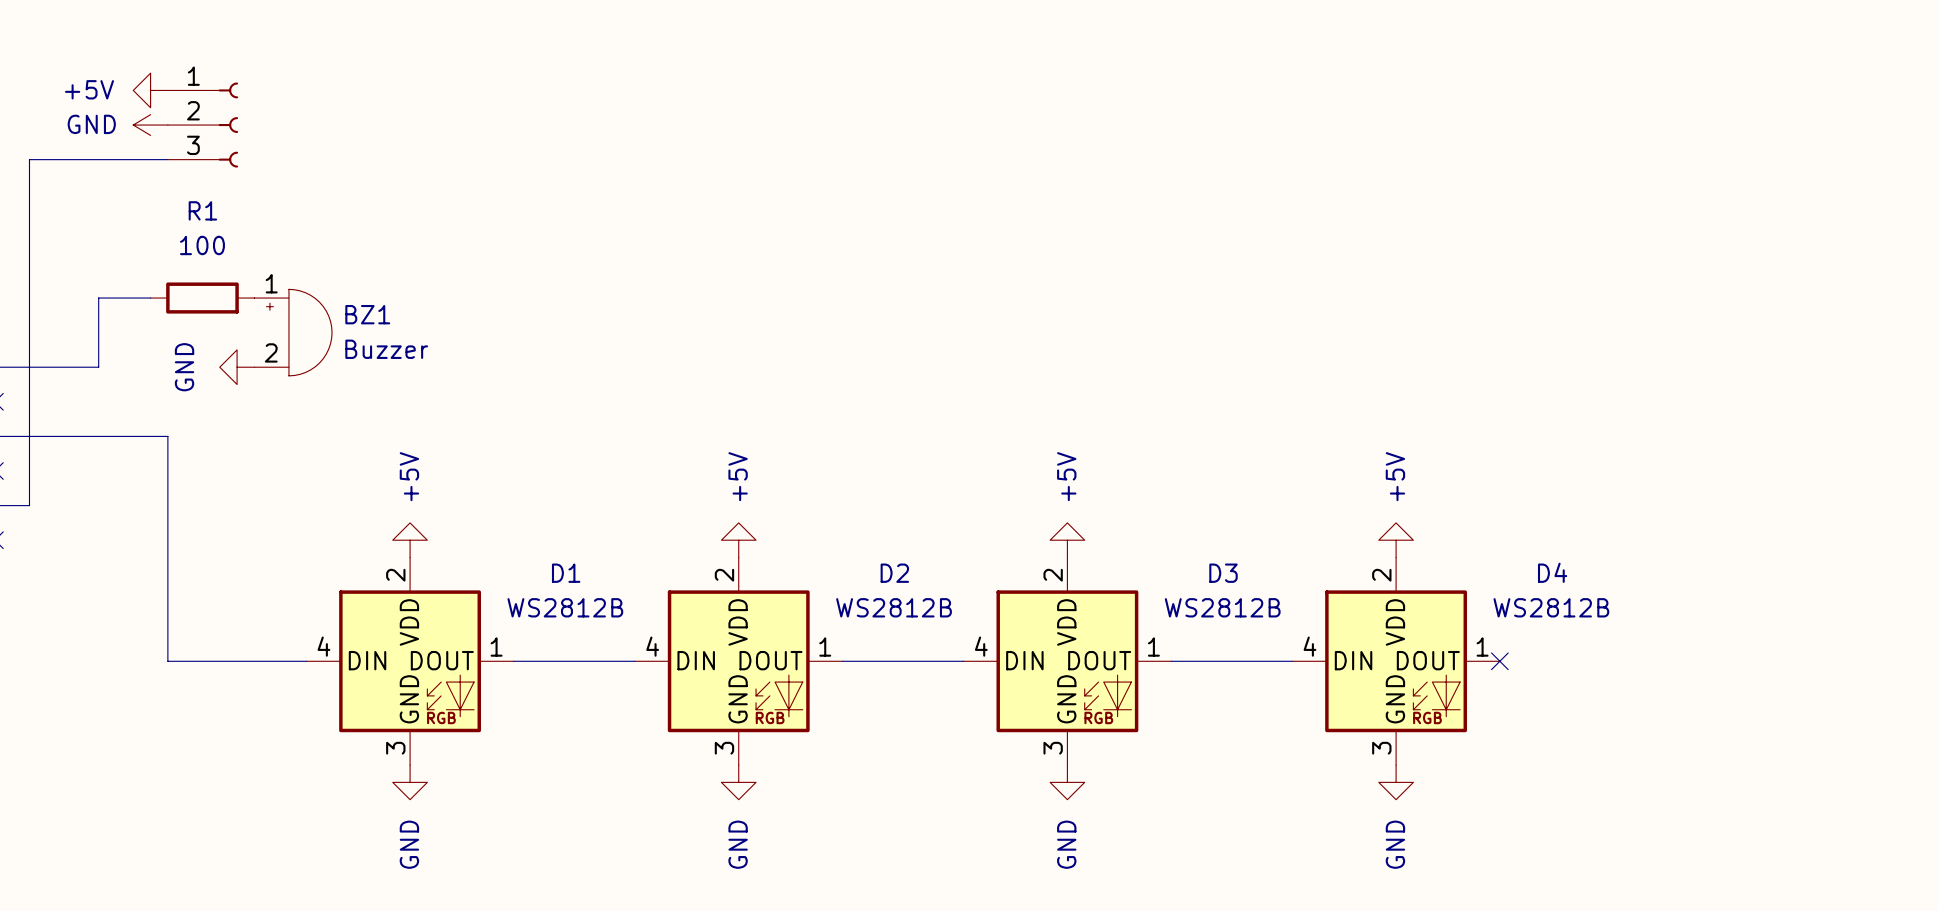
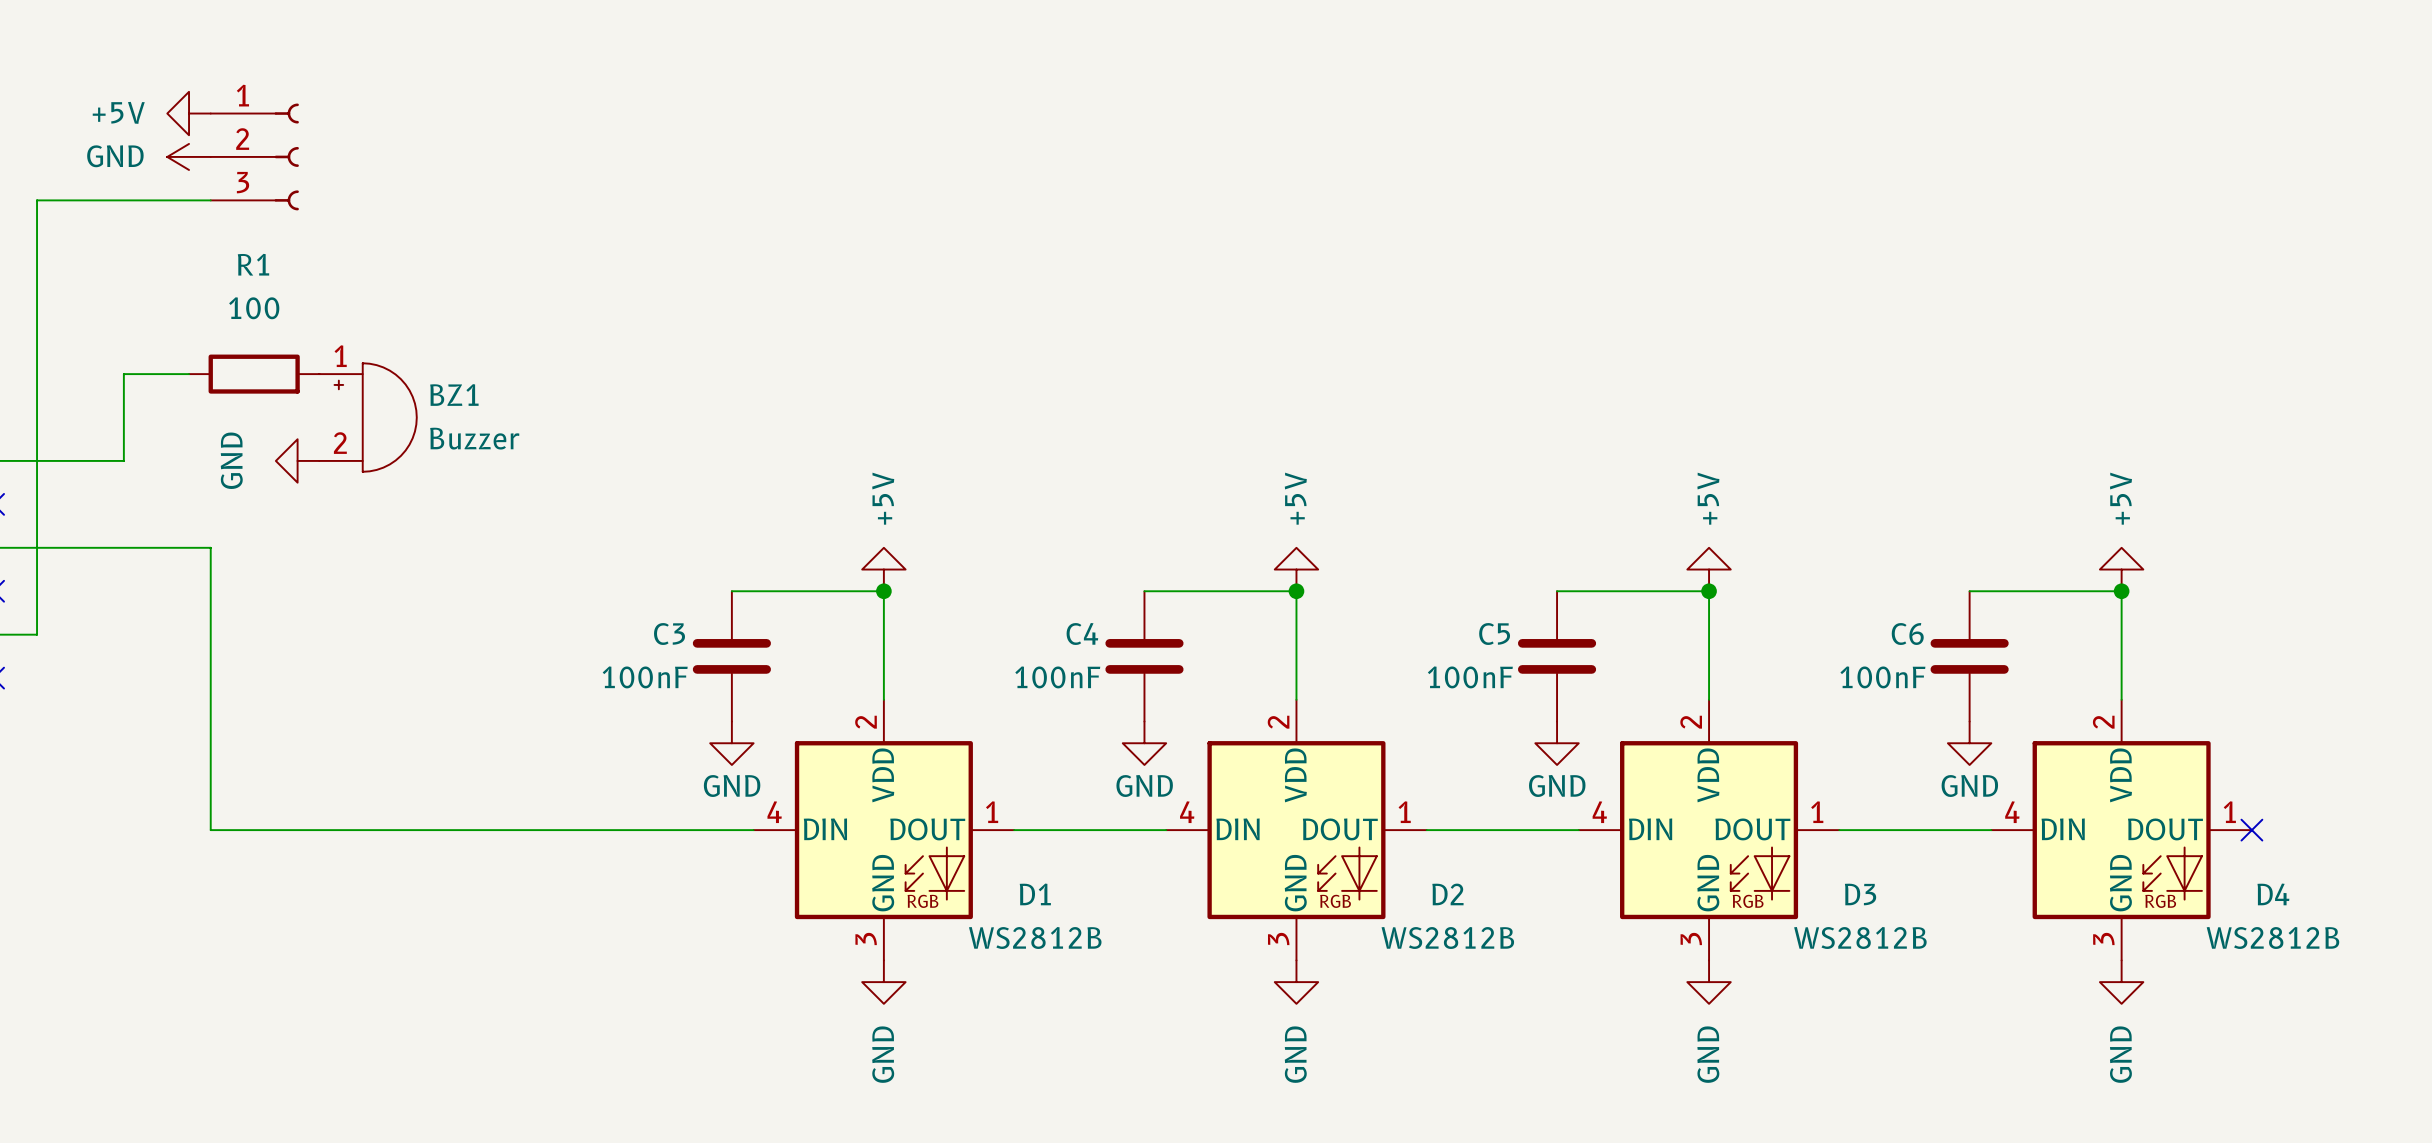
power symbol: none -> +5V (2121, 569)
wire: none -> (731, 591) (883, 591) (883, 699)
junction: none -> (883, 591)
wire: none -> (1144, 591) (1296, 591) (1296, 699)
junction: none -> (1296, 591)
wire: none -> (1557, 591) (1709, 591) (1709, 699)
junction: none -> (1709, 591)
wire: none -> (1969, 591) (2121, 591) (2121, 699)
junction: none -> (2121, 591)
C3: none -> 100nF (731, 656)
C4: none -> 100nF (1144, 656)
C5: none -> 100nF (1557, 656)
C6: none -> 100nF (1969, 656)
power symbol: +5V (410, 540) -> none
power symbol position: +5V (738, 540) -> +5V (883, 569)
power symbol position: +5V (1067, 540) -> +5V (1296, 569)
power symbol position: +5V (1396, 540) -> +5V (1709, 569)
D4 name position: D4 (1552, 572) -> D4 (2273, 894)
D1 name position: D1 (566, 573) -> D1 (1035, 894)
D2 name position: D2 (894, 573) -> D2 (1447, 894)
D3 name position: D3 (1223, 573) -> D3 (1860, 894)
power symbol: none -> GND (731, 743)
power symbol: none -> GND (1144, 743)
power symbol: none -> GND (1557, 743)
power symbol: none -> GND (1969, 743)
D1 value position: WS2812B (565, 607) -> WS2812B (1035, 937)
D2 value position: WS2812B (894, 607) -> WS2812B (1447, 937)
D3 value position: WS2812B (1222, 607) -> WS2812B (1860, 937)
D4 value position: WS2812B (1551, 607) -> WS2812B (2272, 937)
D1 position: (410, 661) -> (883, 830)
D2 position: (738, 661) -> (1296, 830)
D3 position: (1067, 661) -> (1709, 830)
D4 position: (1396, 661) -> (2121, 830)
wire: none -> (1839, 830) (1991, 830)
no-connect mark: (1499, 661) -> none
no-connect mark: none -> (2251, 830)
power symbol: GND (410, 782) -> none
power symbol position: GND (738, 782) -> GND (883, 982)
power symbol position: GND (1067, 782) -> GND (1296, 982)
power symbol position: GND (1396, 782) -> GND (1709, 982)
power symbol: none -> GND (2121, 982)

